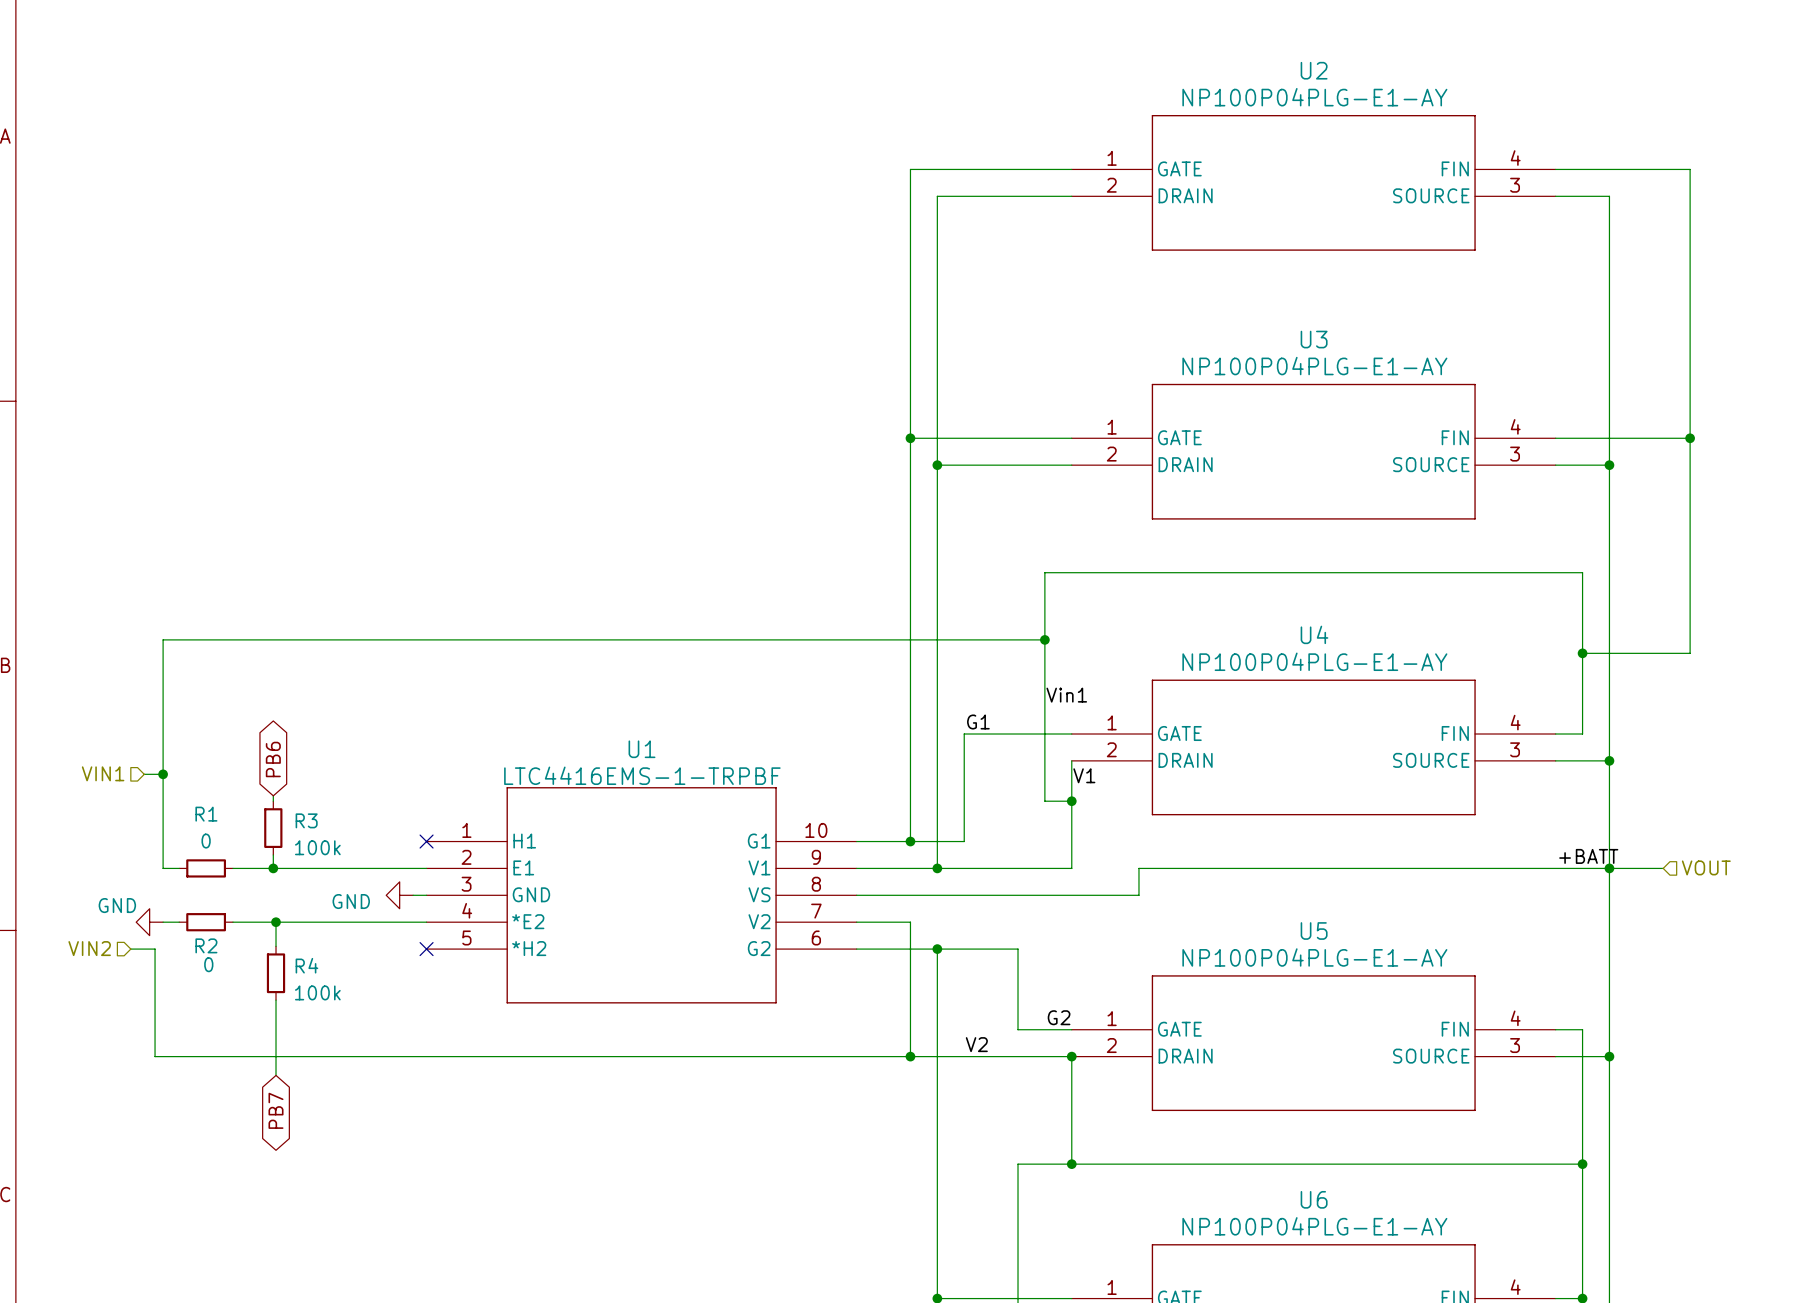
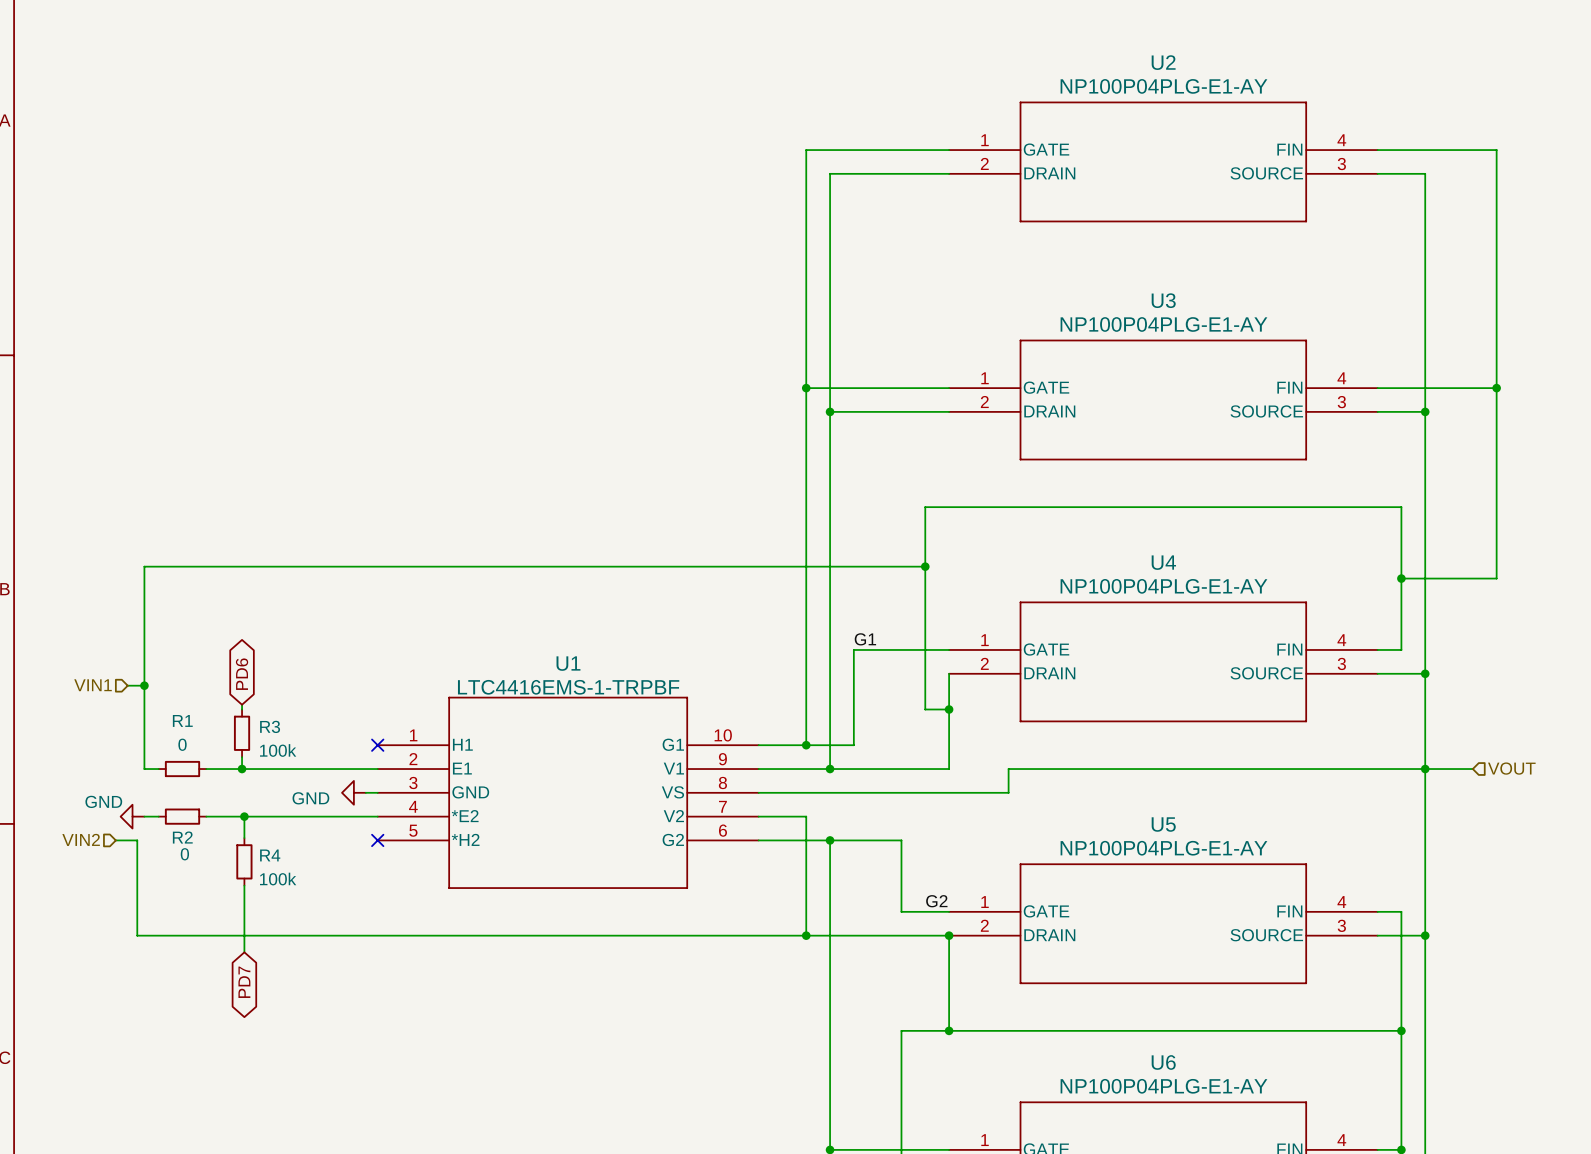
label: Vin1 (1066, 695) -> none
global label: PB6 (273, 759) -> PD6 (242, 674)
label: V1 (1084, 775) -> none
label: +BATT (1588, 856) -> none
label: V2 (976, 1044) -> none
global label: PB7 (276, 1110) -> PD7 (244, 982)

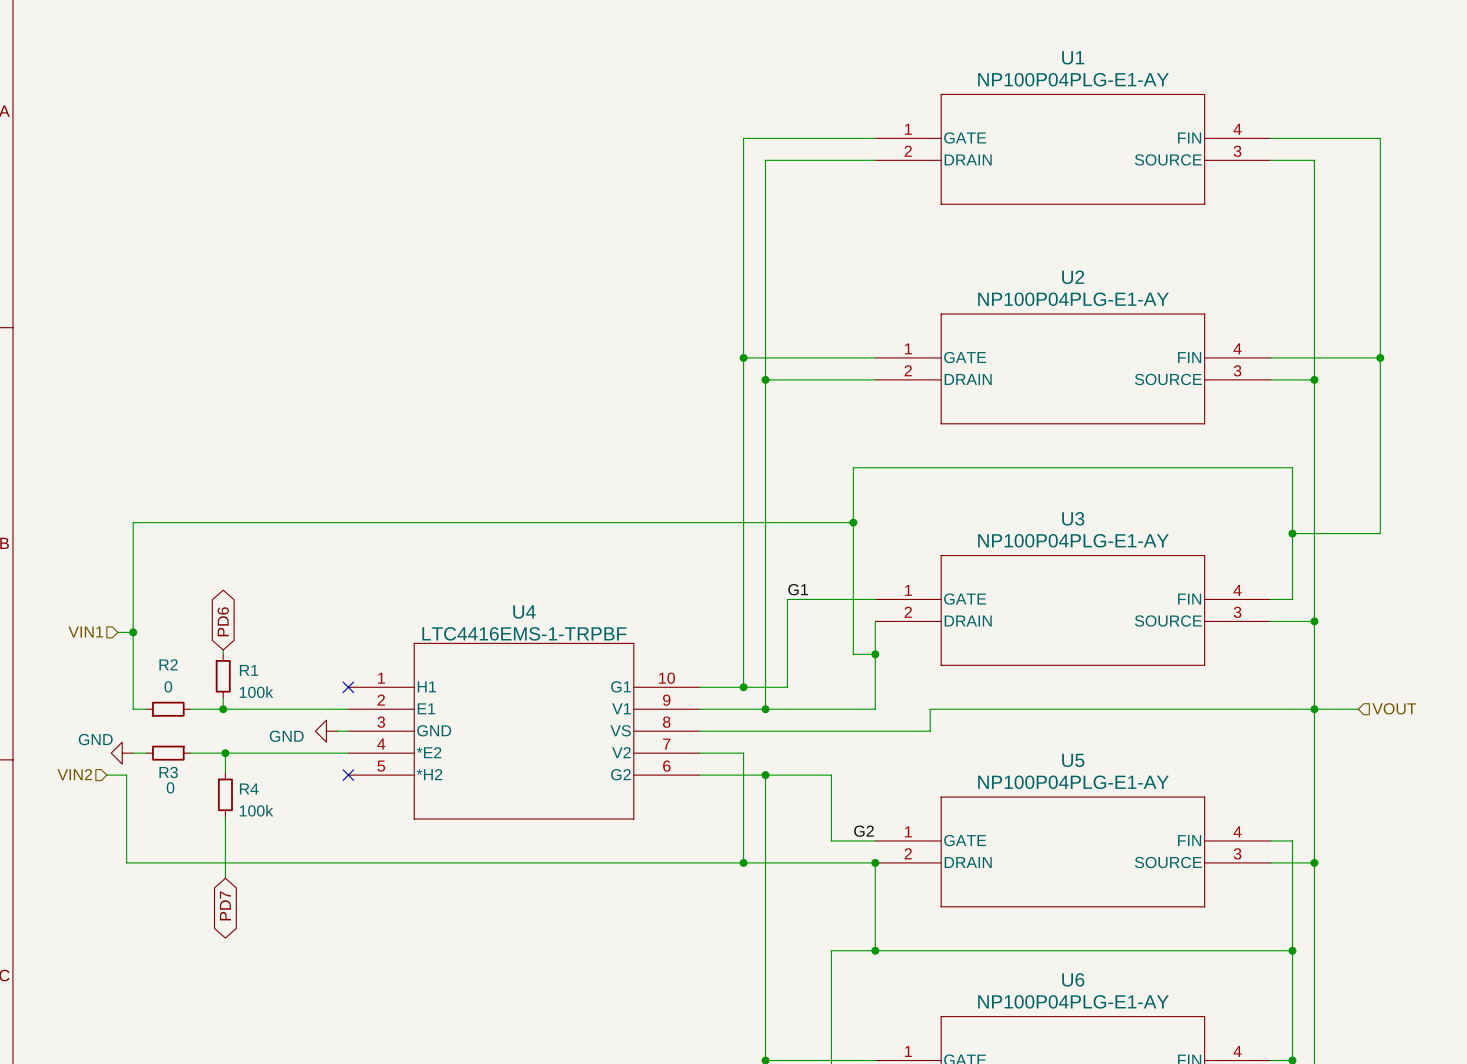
U2 name: U2 (1163, 62) -> U1 (1073, 57)
U3 name: U3 (1163, 300) -> U2 (1073, 277)
U4 name: U4 (1163, 562) -> U3 (1073, 518)
U1 name: U1 (568, 663) -> U4 (524, 612)
R1 name: R1 (182, 720) -> R2 (168, 664)
R3 name: R3 (270, 726) -> R1 (249, 670)
R2 name: R2 (182, 837) -> R3 (168, 772)

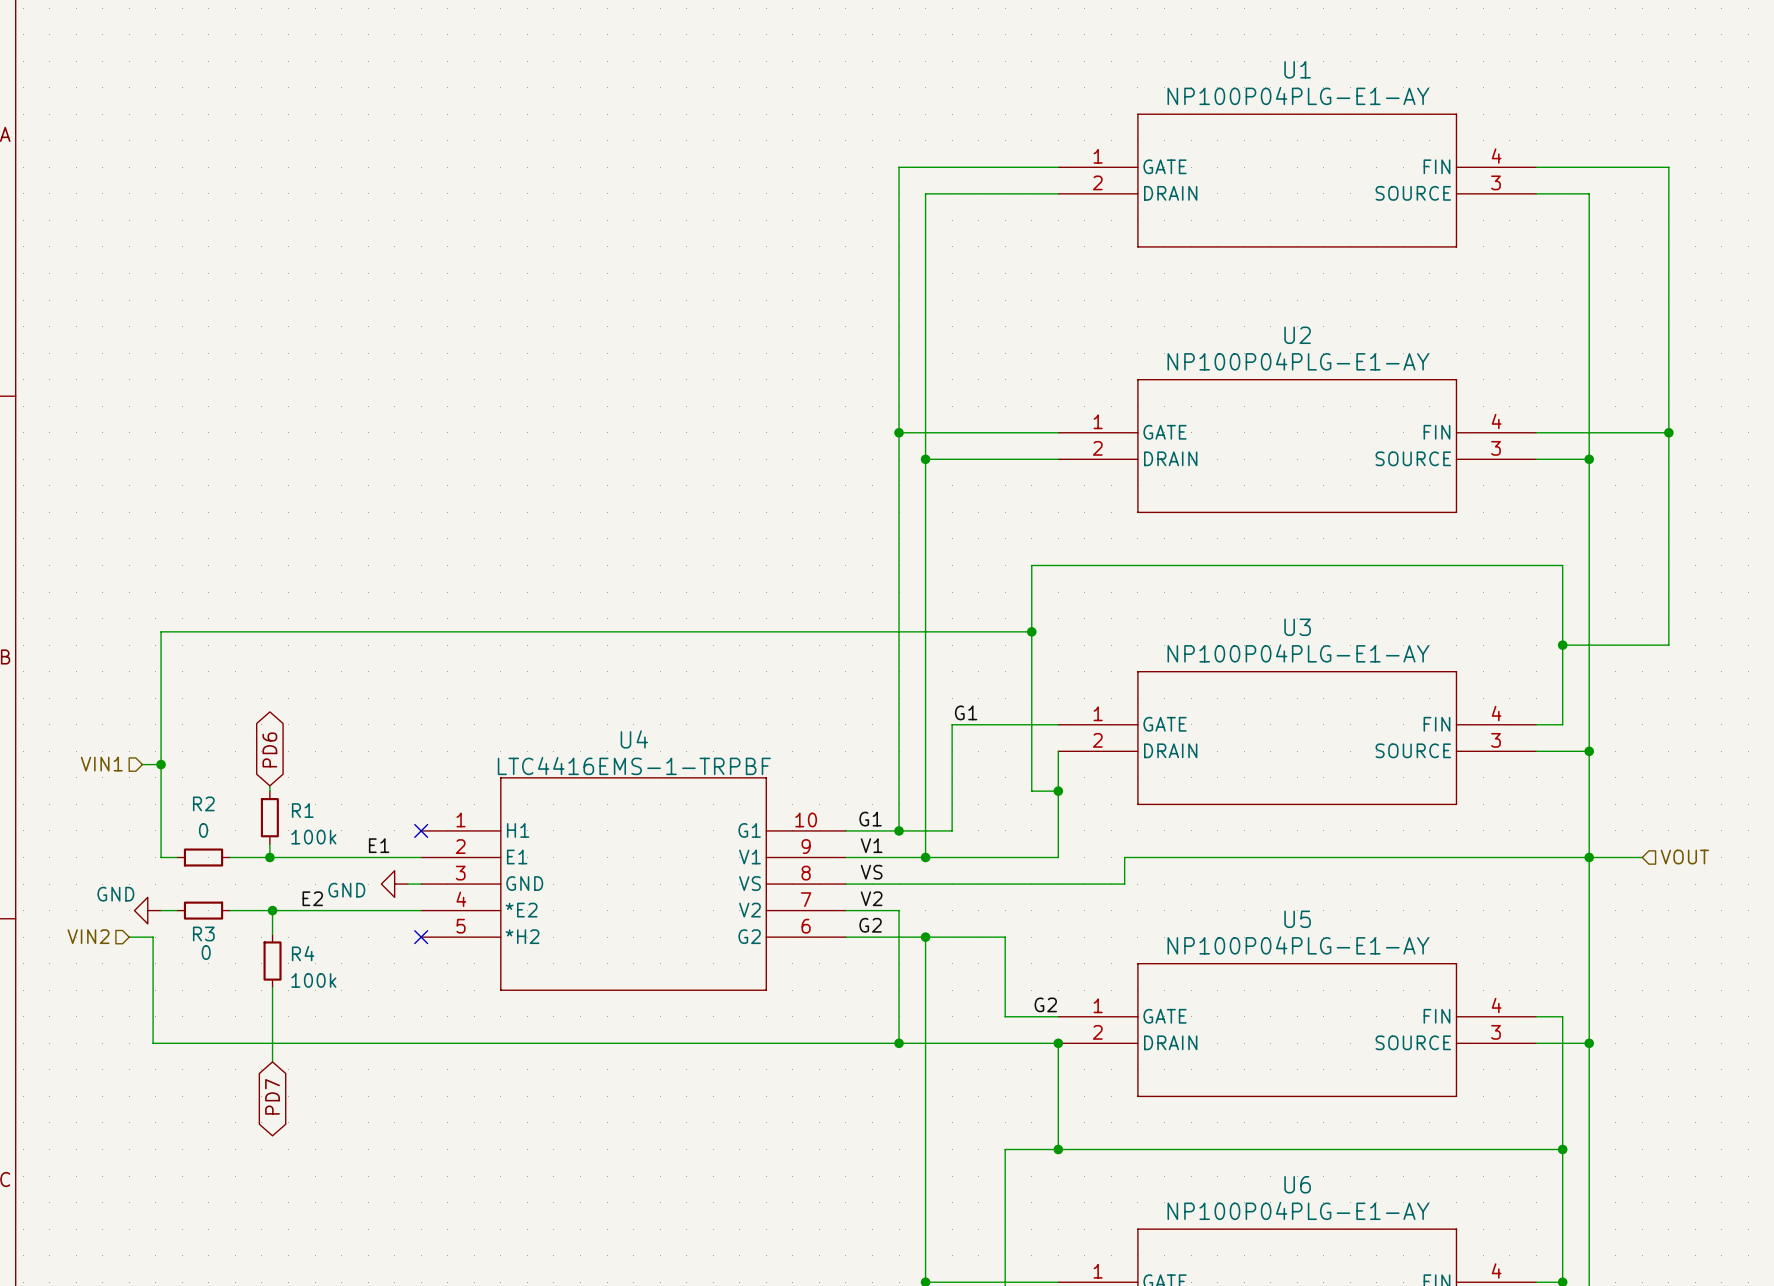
label: none -> G1 (870, 819)
label: none -> E1 (379, 845)
label: none -> V1 (871, 845)
label: none -> VS (871, 872)
label: none -> E2 (312, 898)
label: none -> V2 (871, 898)
label: none -> G2 (870, 925)

